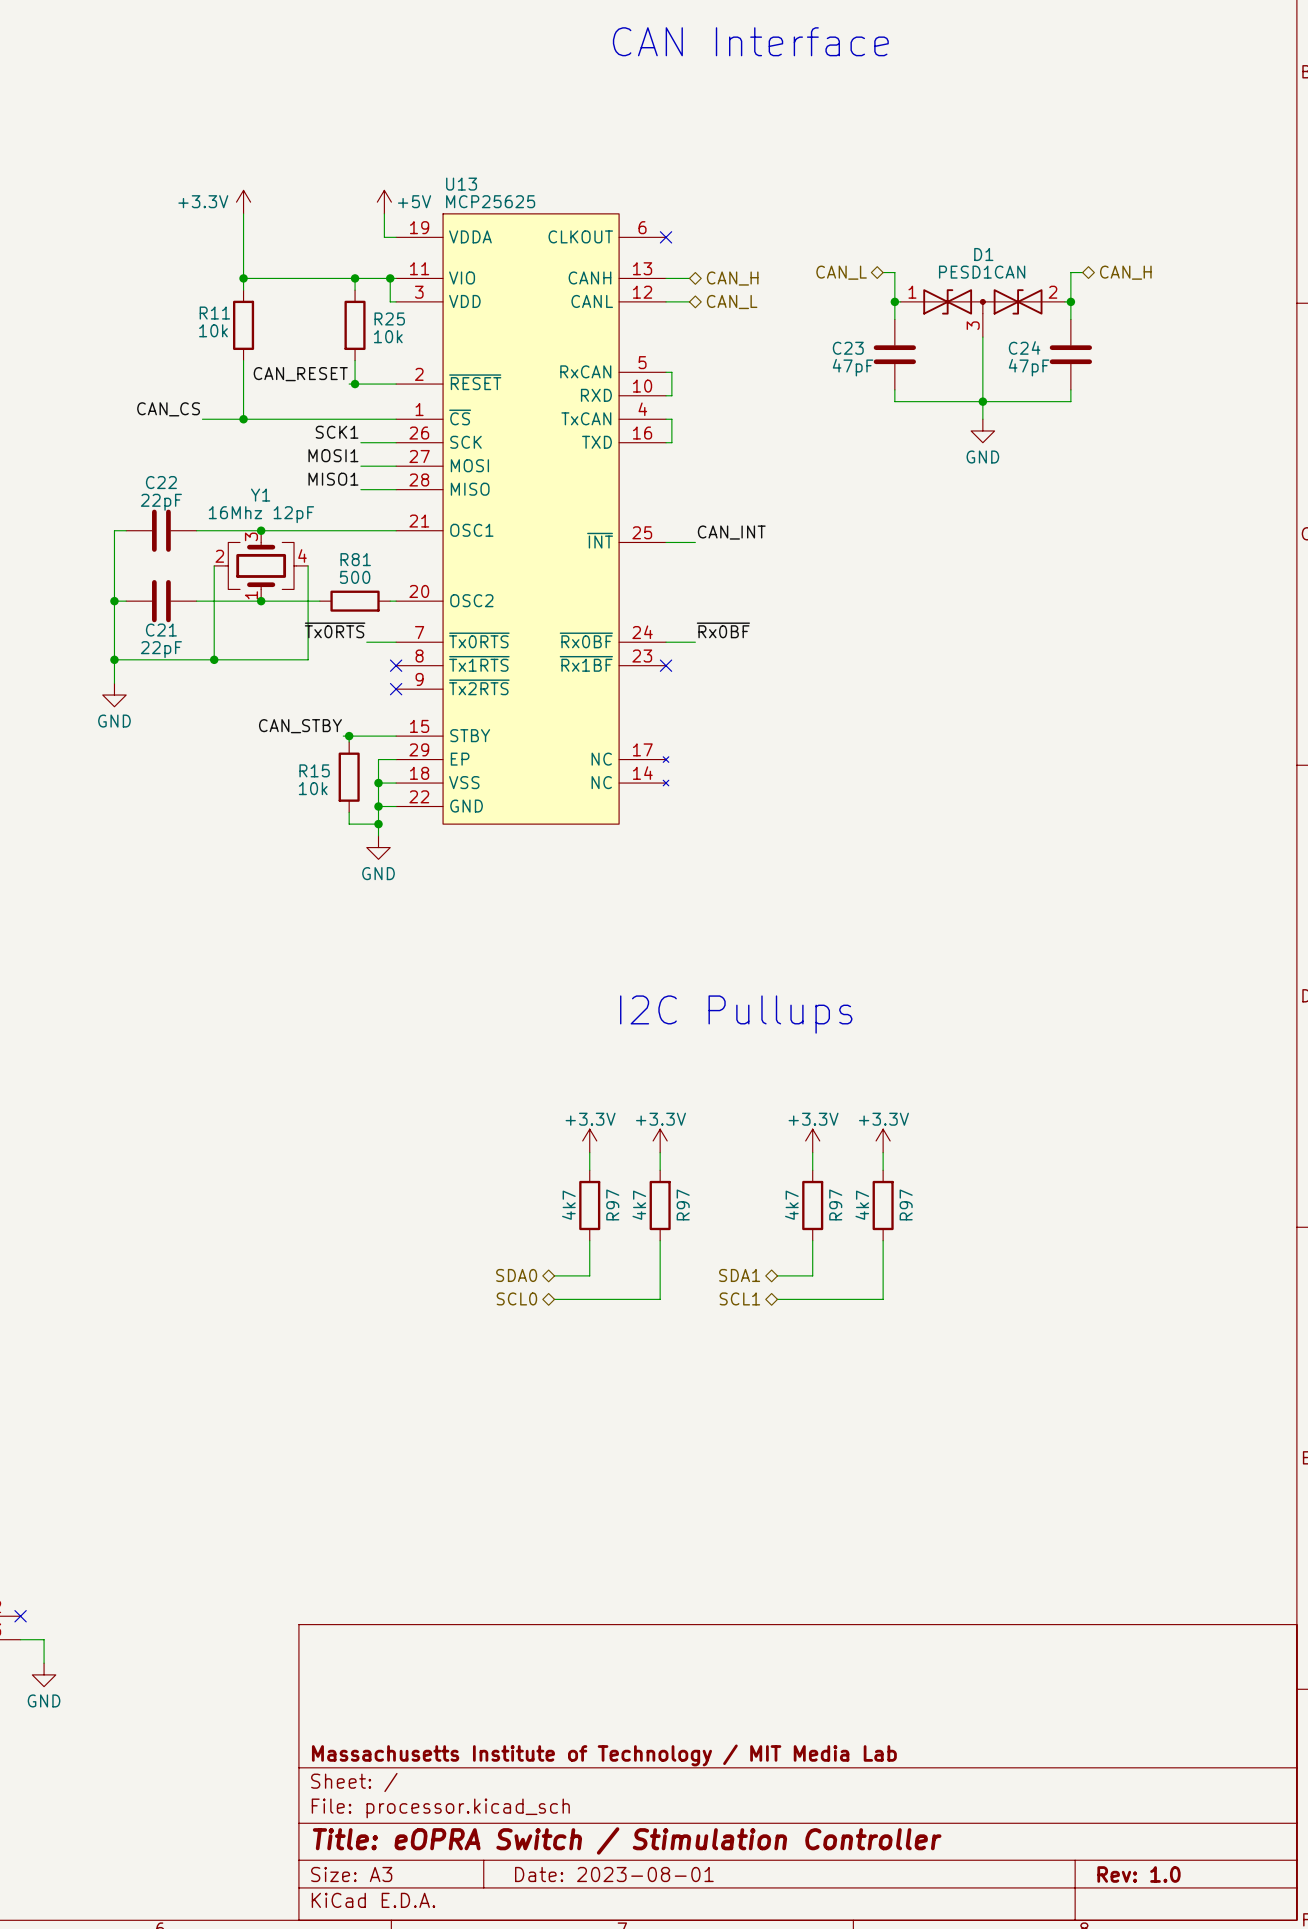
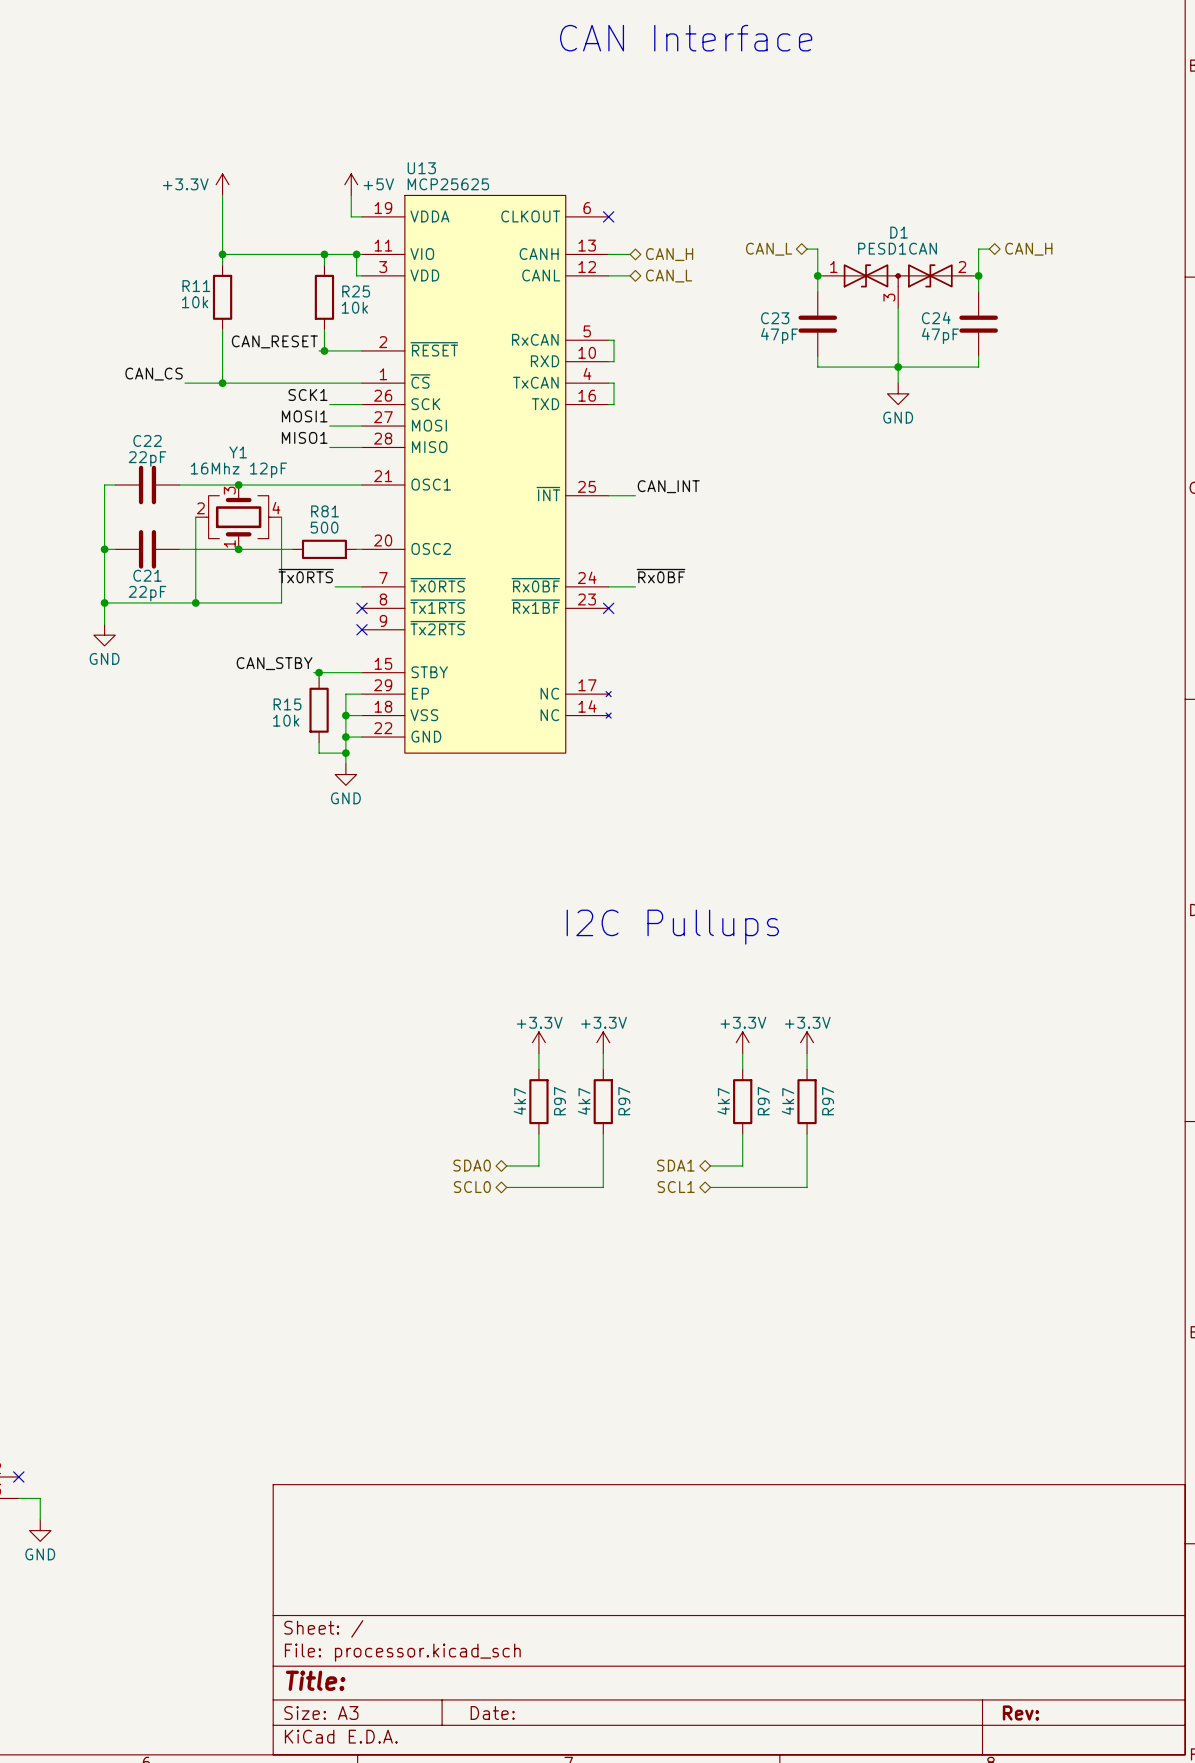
title block: Massachusetts Institute of Technology / MIT Media Lab (604, 1755) -> none
title block: Title: eOPRA Switch / Stimulation Controller (627, 1840) -> Title: (315, 1680)
title block: Date: 2023-08-01 (614, 1874) -> Date: (492, 1713)
title block: Rev: 1.0 (1139, 1874) -> Rev: (1020, 1713)

